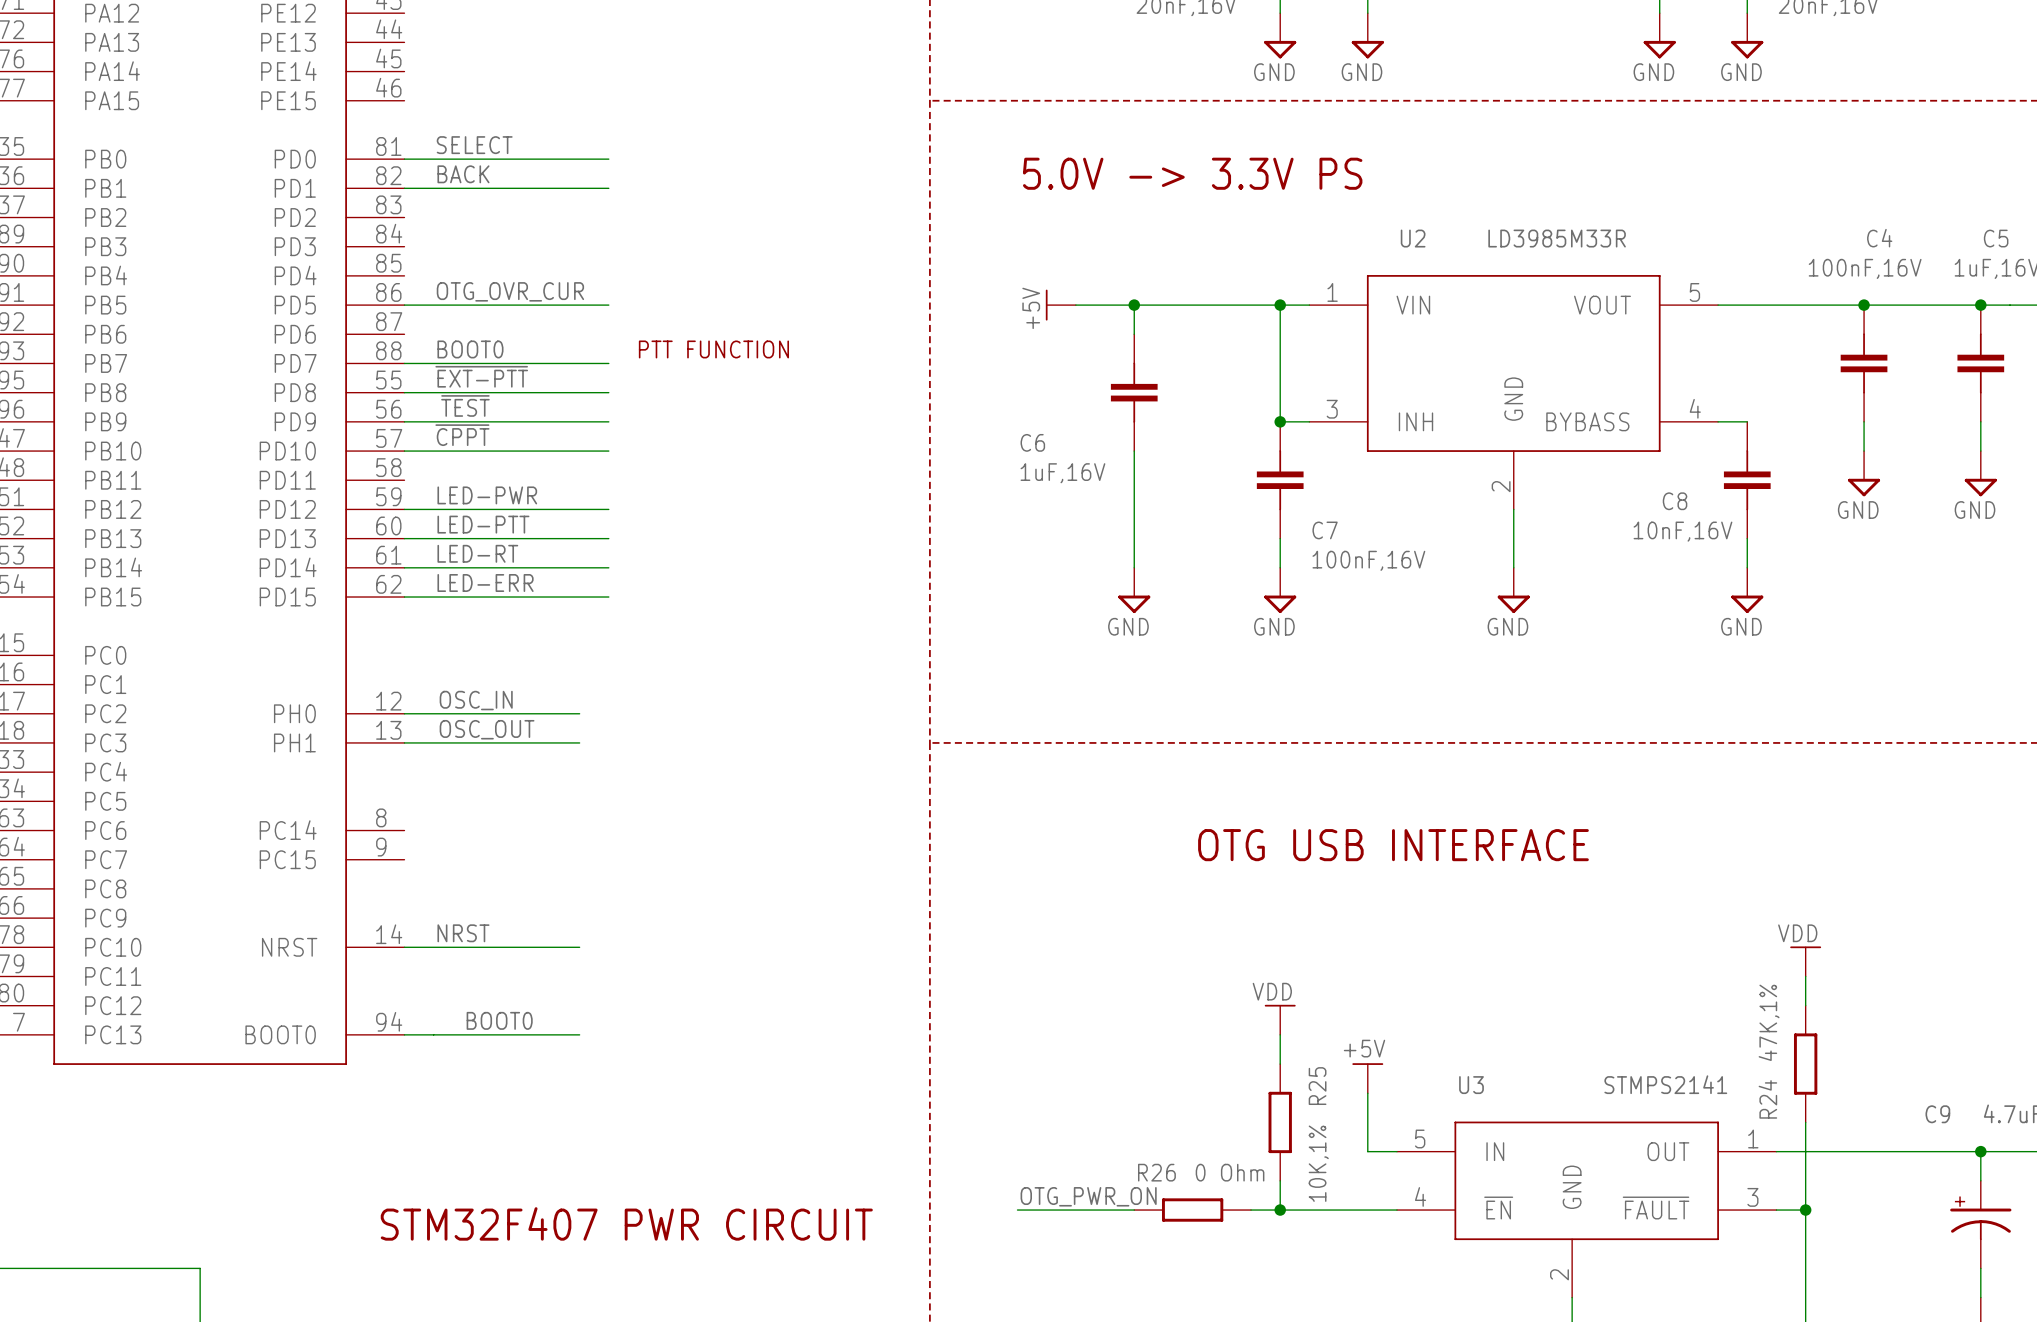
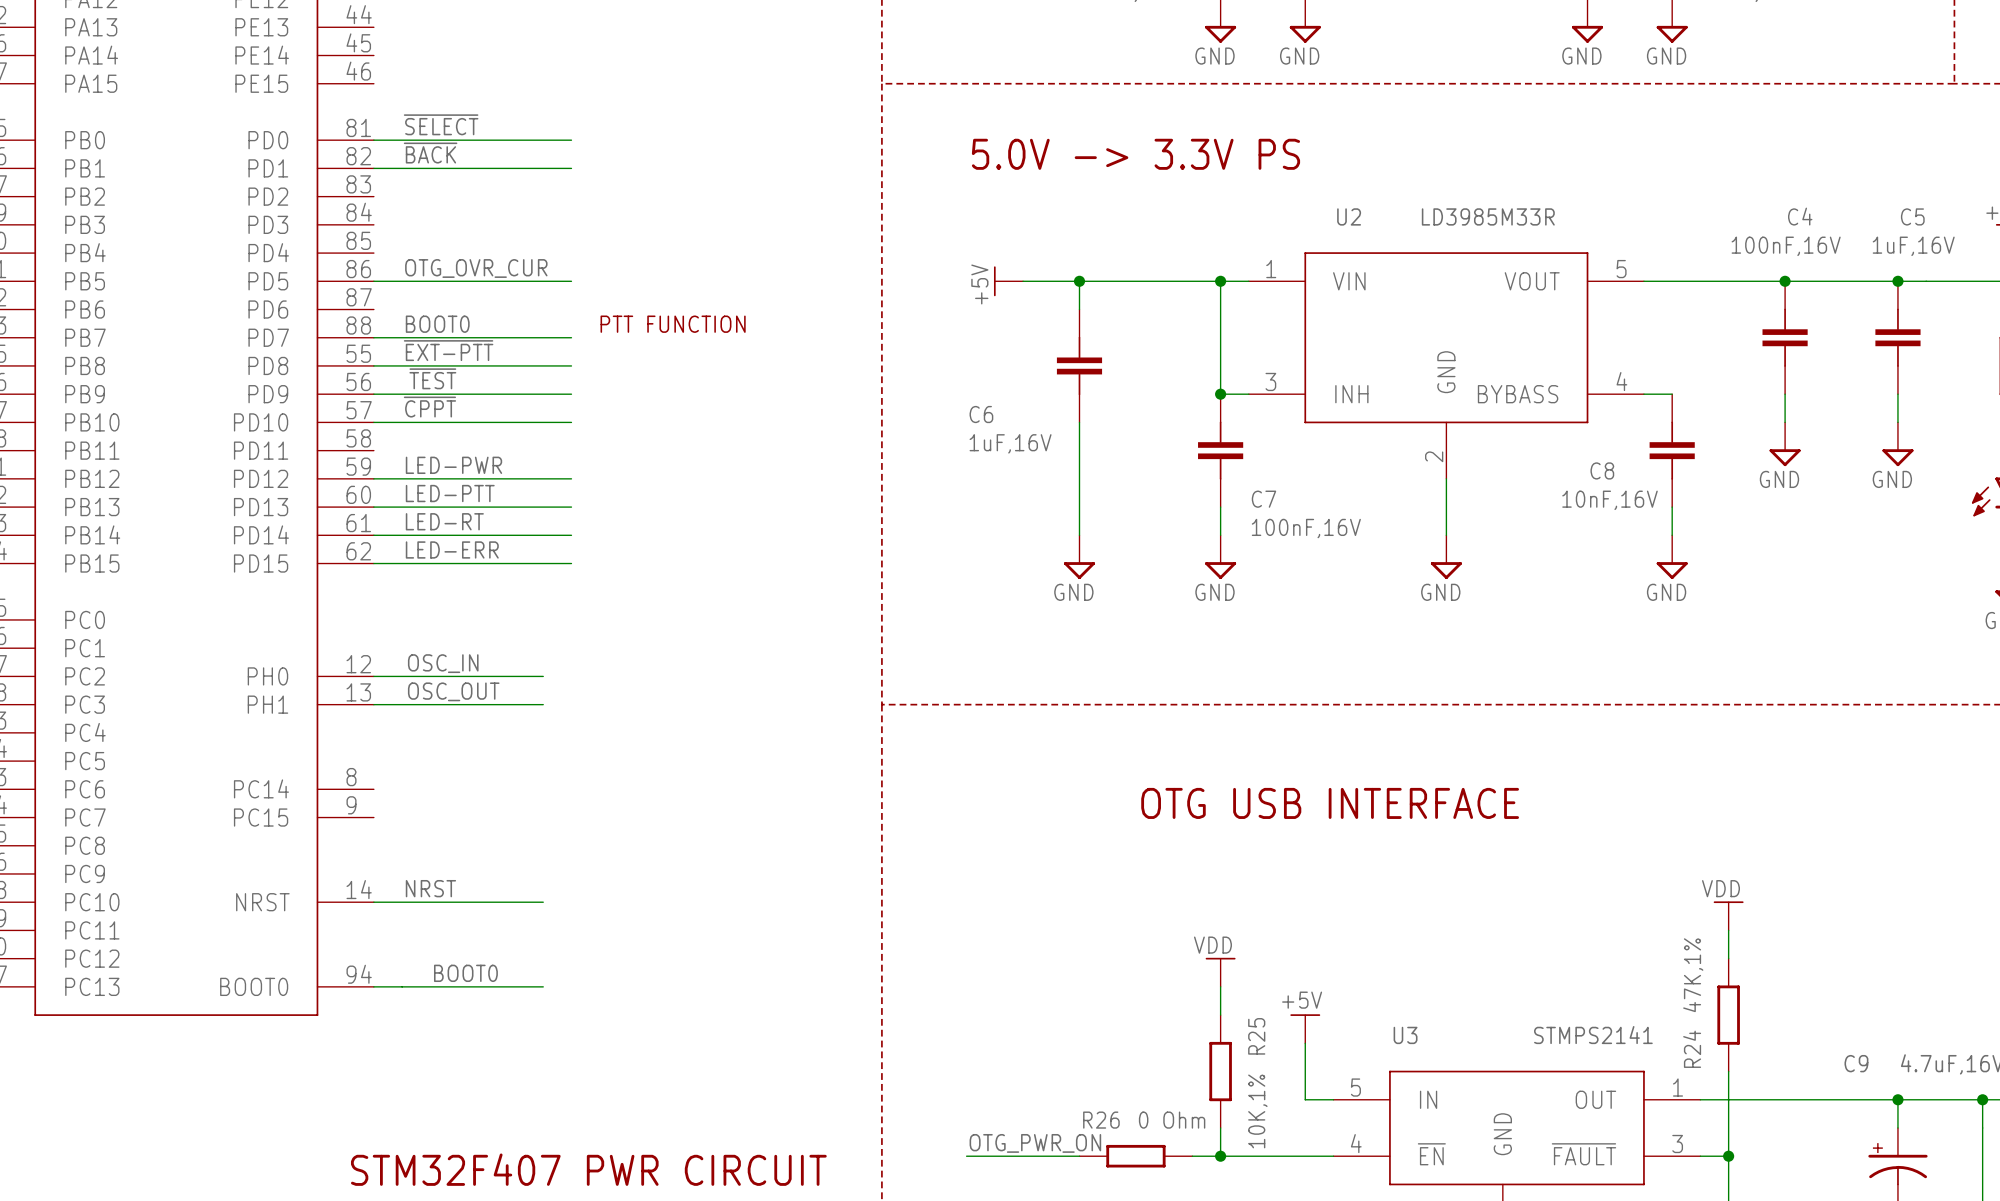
label: SELECT (474, 145) -> ~{SELECT} (441, 124)
label: BACK (463, 174) -> ~{BACK} (430, 153)

